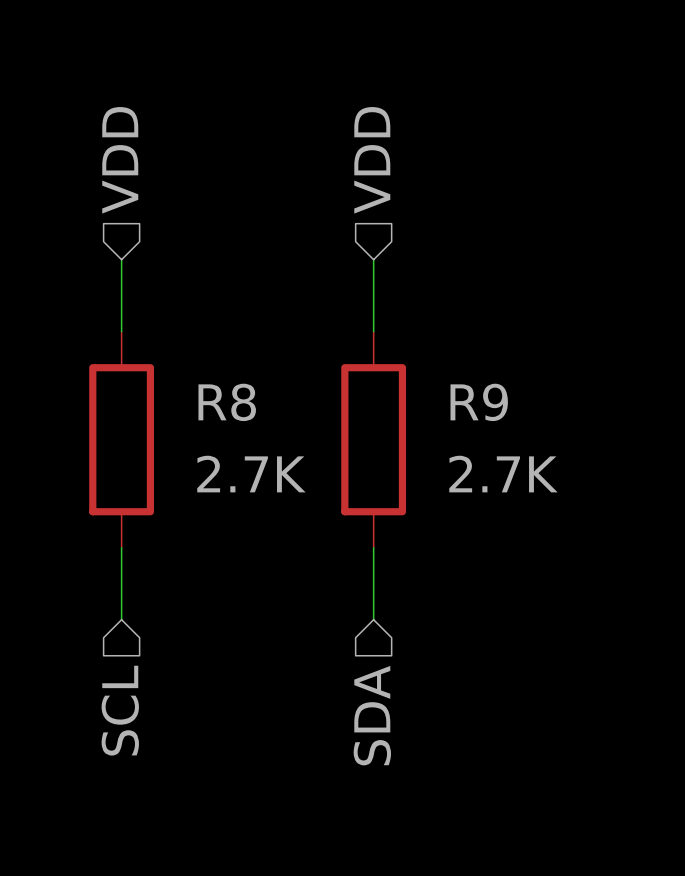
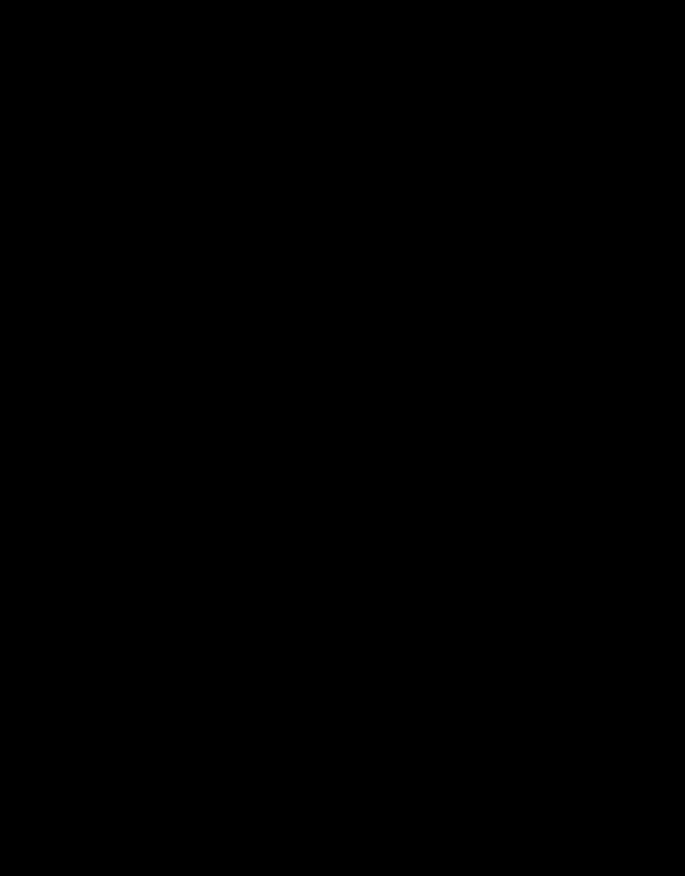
hierarchical label: VDD (120, 160) -> none
hierarchical label: VDD (372, 160) -> none
wire: (121, 259) (121, 331) -> none
wire: (373, 259) (373, 331) -> none
R8: 2.7K (121, 439) -> none
R9: 2.7K (373, 439) -> none
wire: (121, 547) (121, 619) -> none
wire: (373, 547) (373, 619) -> none
hierarchical label: SCL (120, 710) -> none
hierarchical label: SDA (372, 715) -> none

